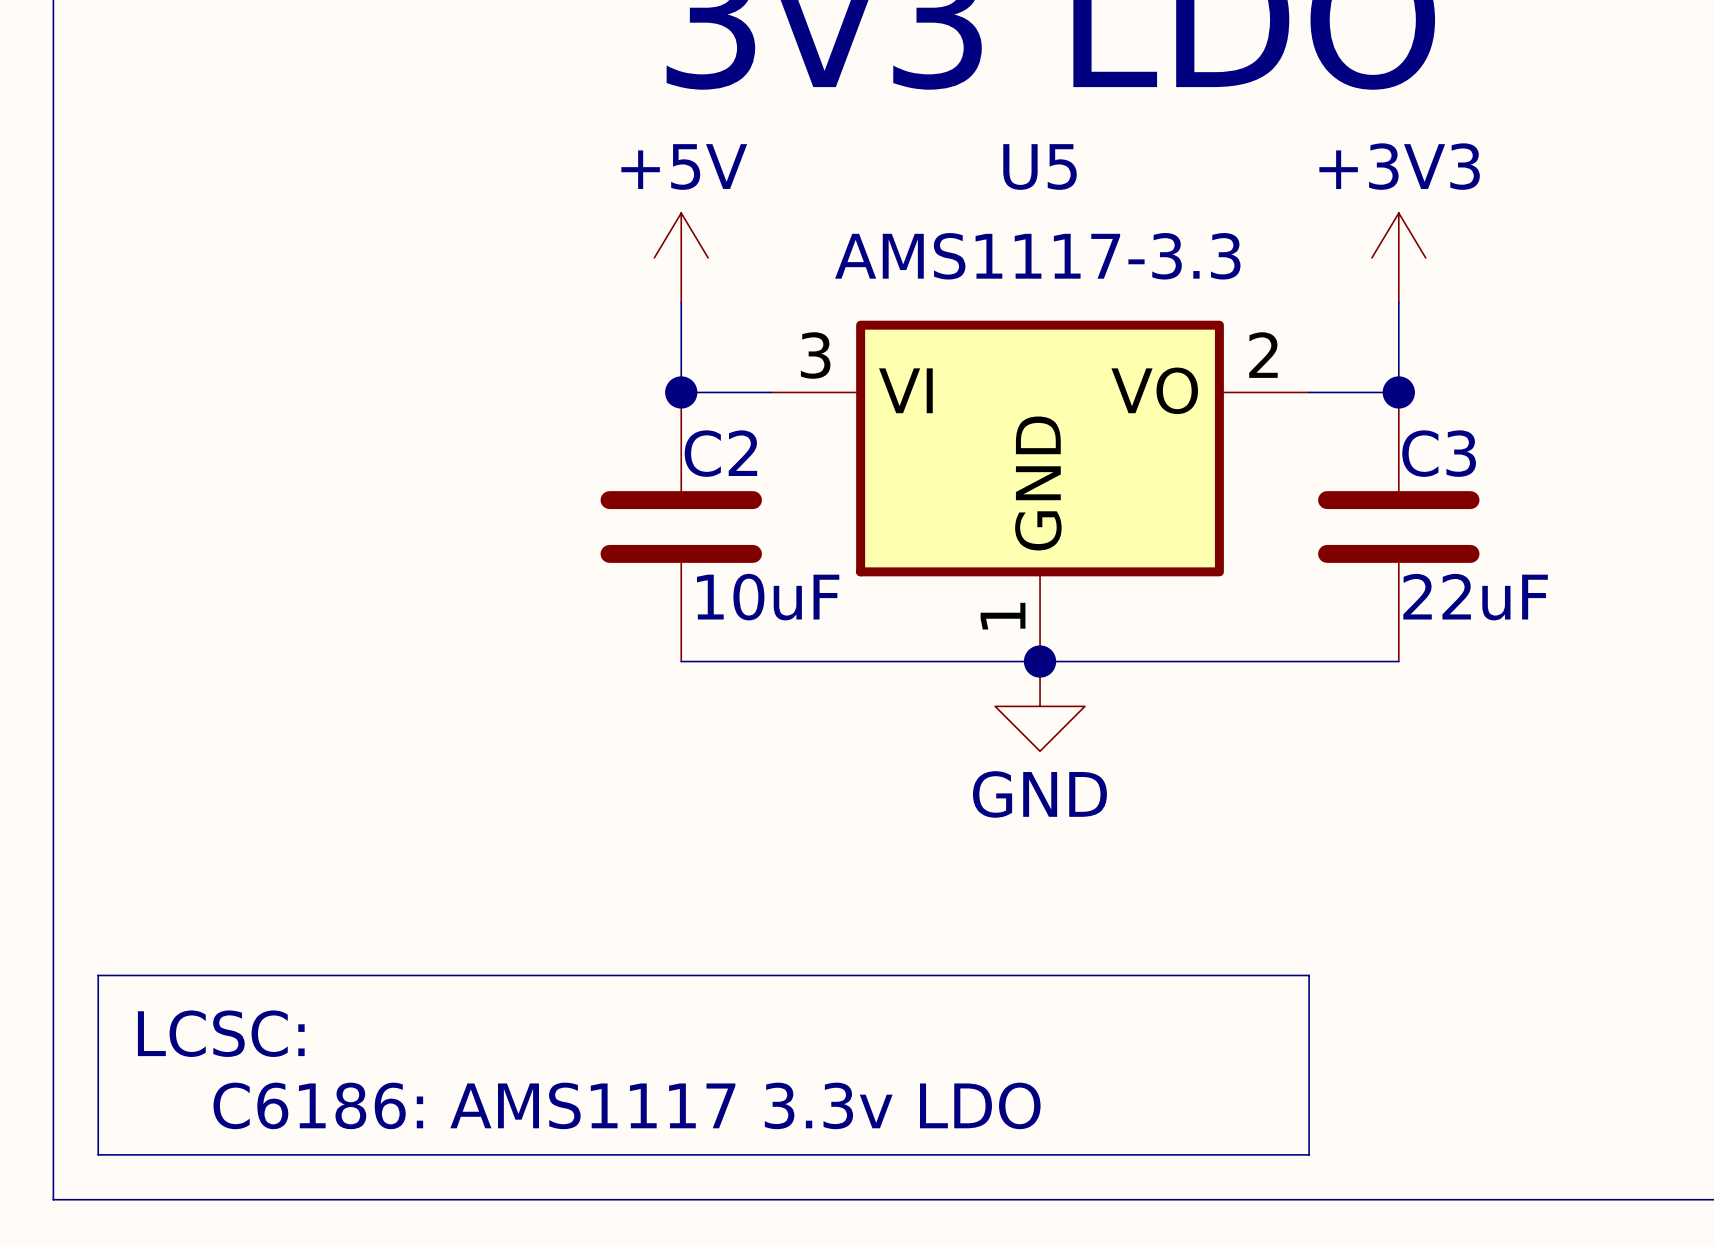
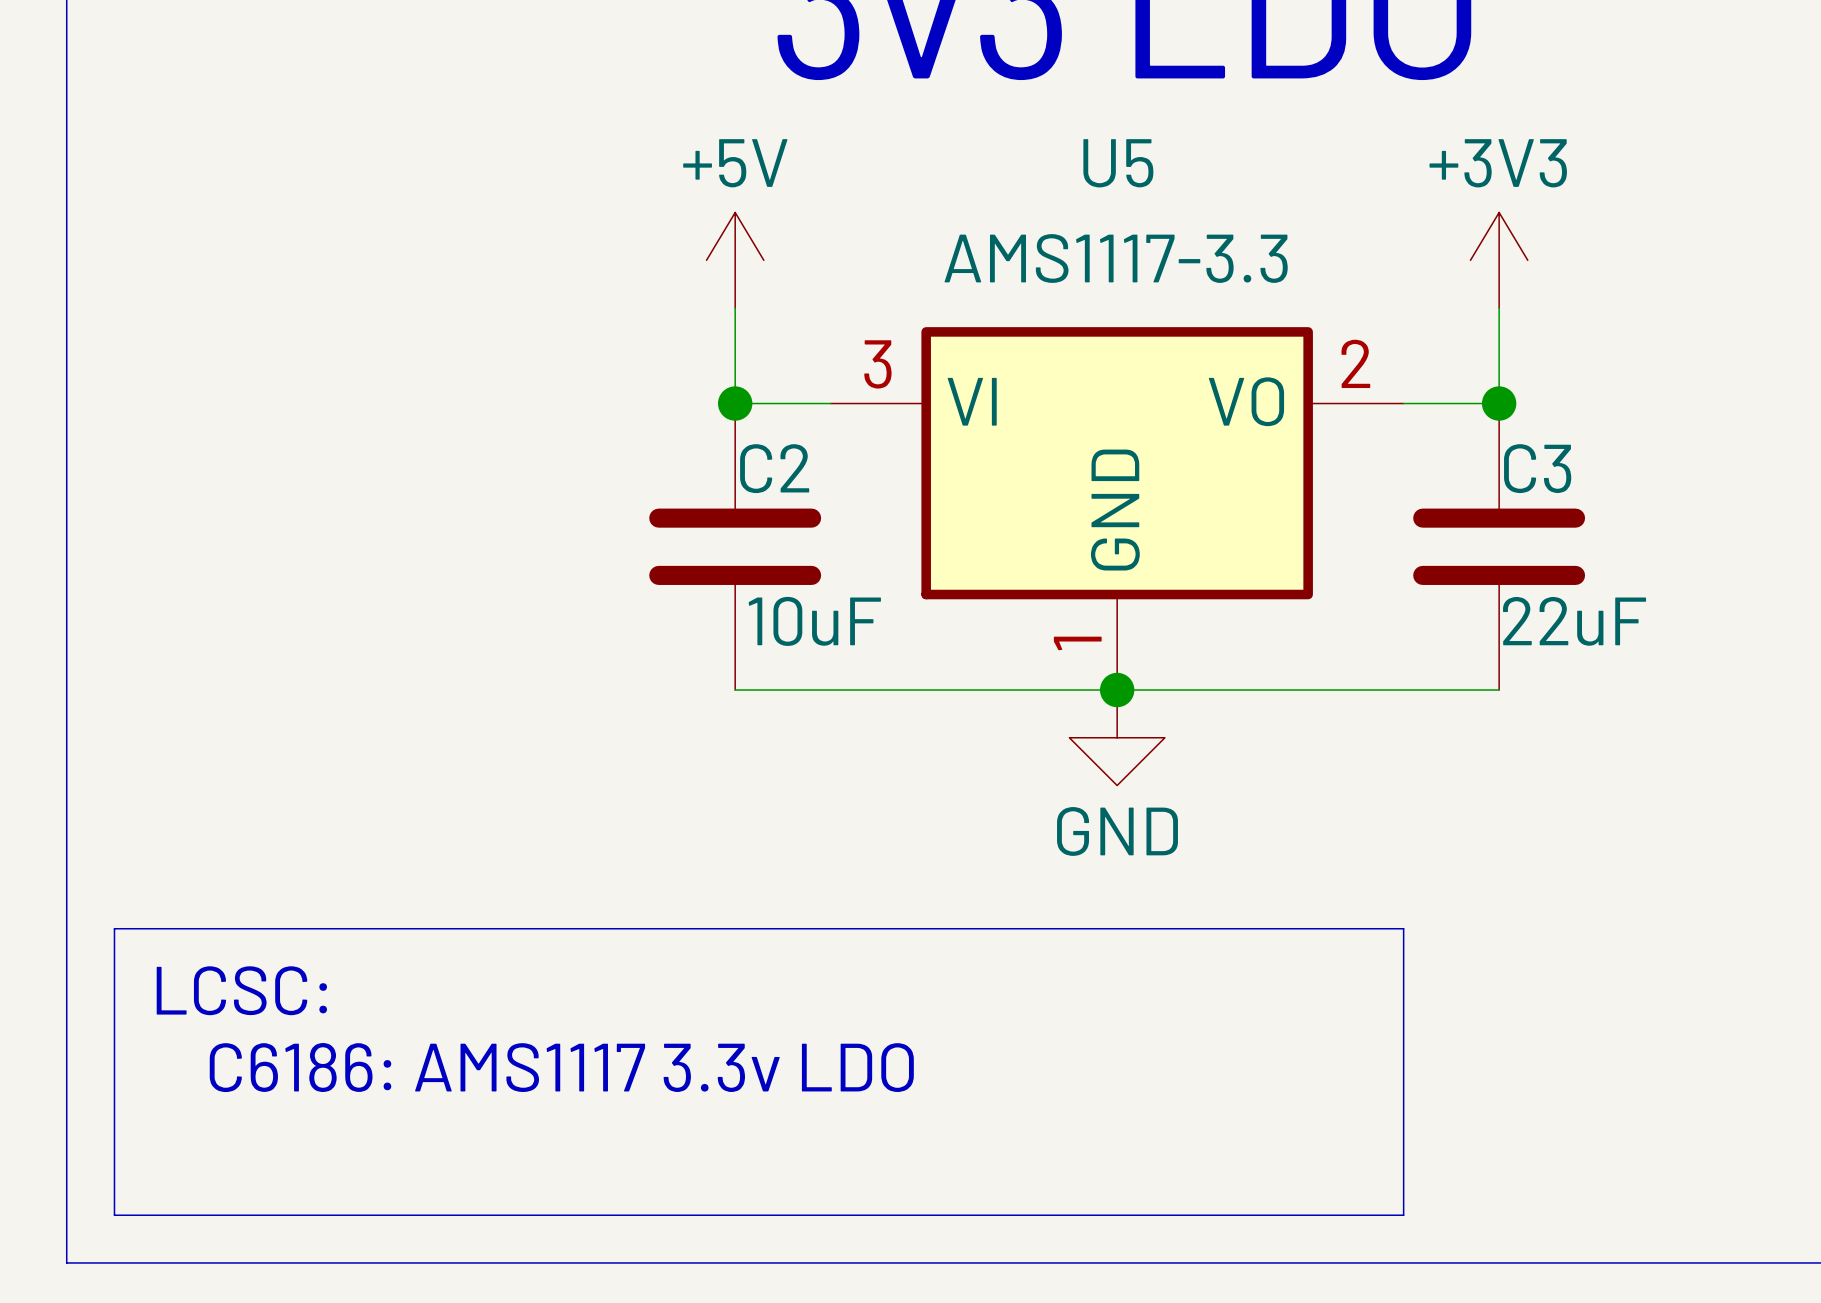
text: none -> LCSC: (241, 990)
line: (98, 975) (1309, 975) -> (114, 1024) (114, 928) (1403, 928) (1403, 1024)
text: LCSC: (221, 1033) -> C6186: AMS1117 3.3v LDO (561, 1067)
text: C6186: AMS1117 3.3v LDO (627, 1105) -> none

